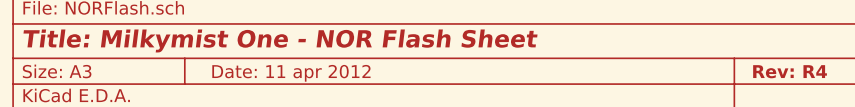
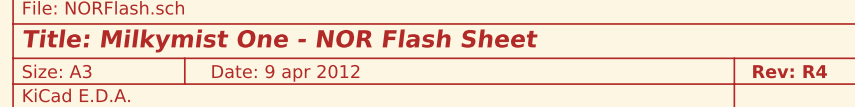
title block: Date: 11 apr 2012 (291, 73) -> Date: 9 apr 2012 (285, 73)

